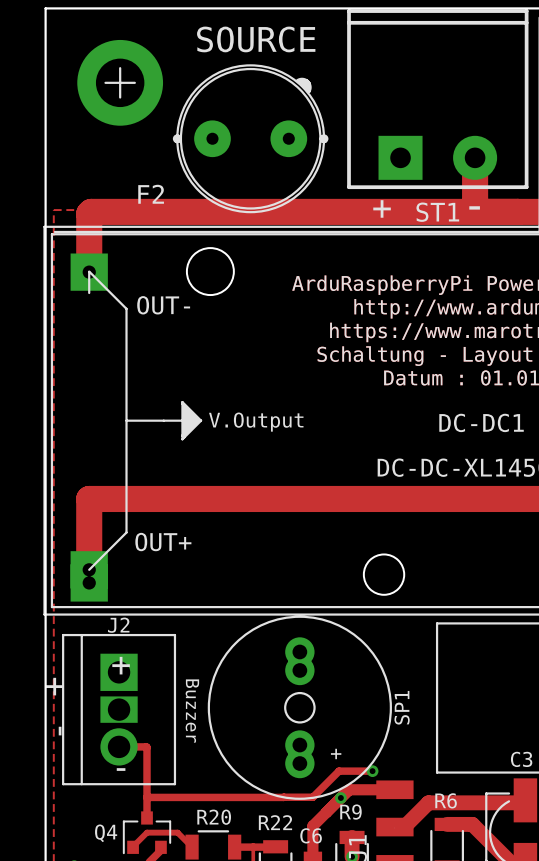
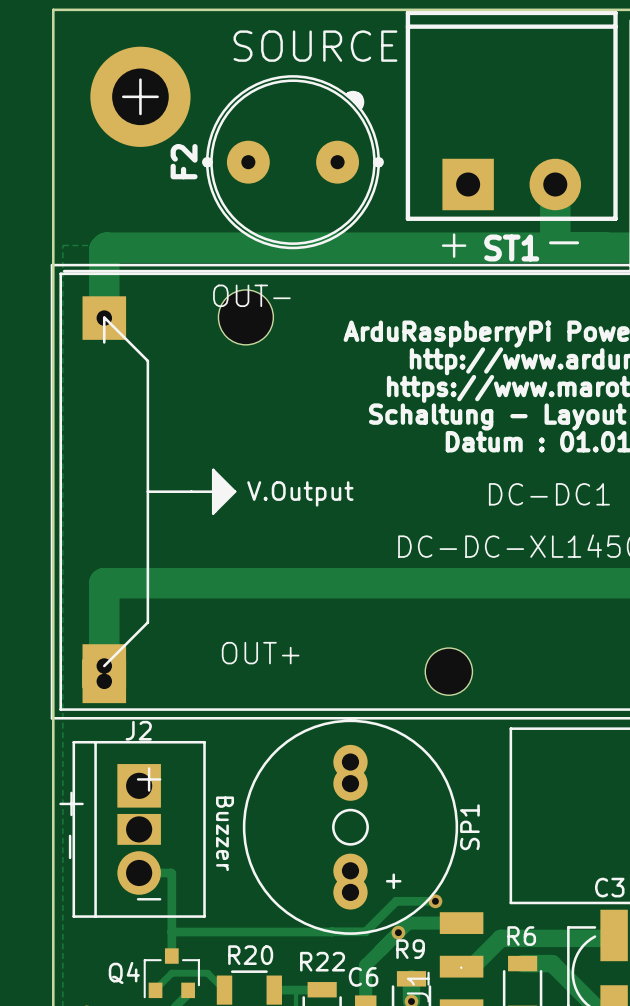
F2 name rotation: 0° (151, 194) -> 90° counterclockwise (184, 161)
F2 name position: F2 (151, 194) -> F2 (184, 161)
DC-DC1 text position: OUT- (163, 305) -> OUT- (251, 295)
DC-DC1 text position: OUT+ (163, 542) -> OUT+ (260, 653)

